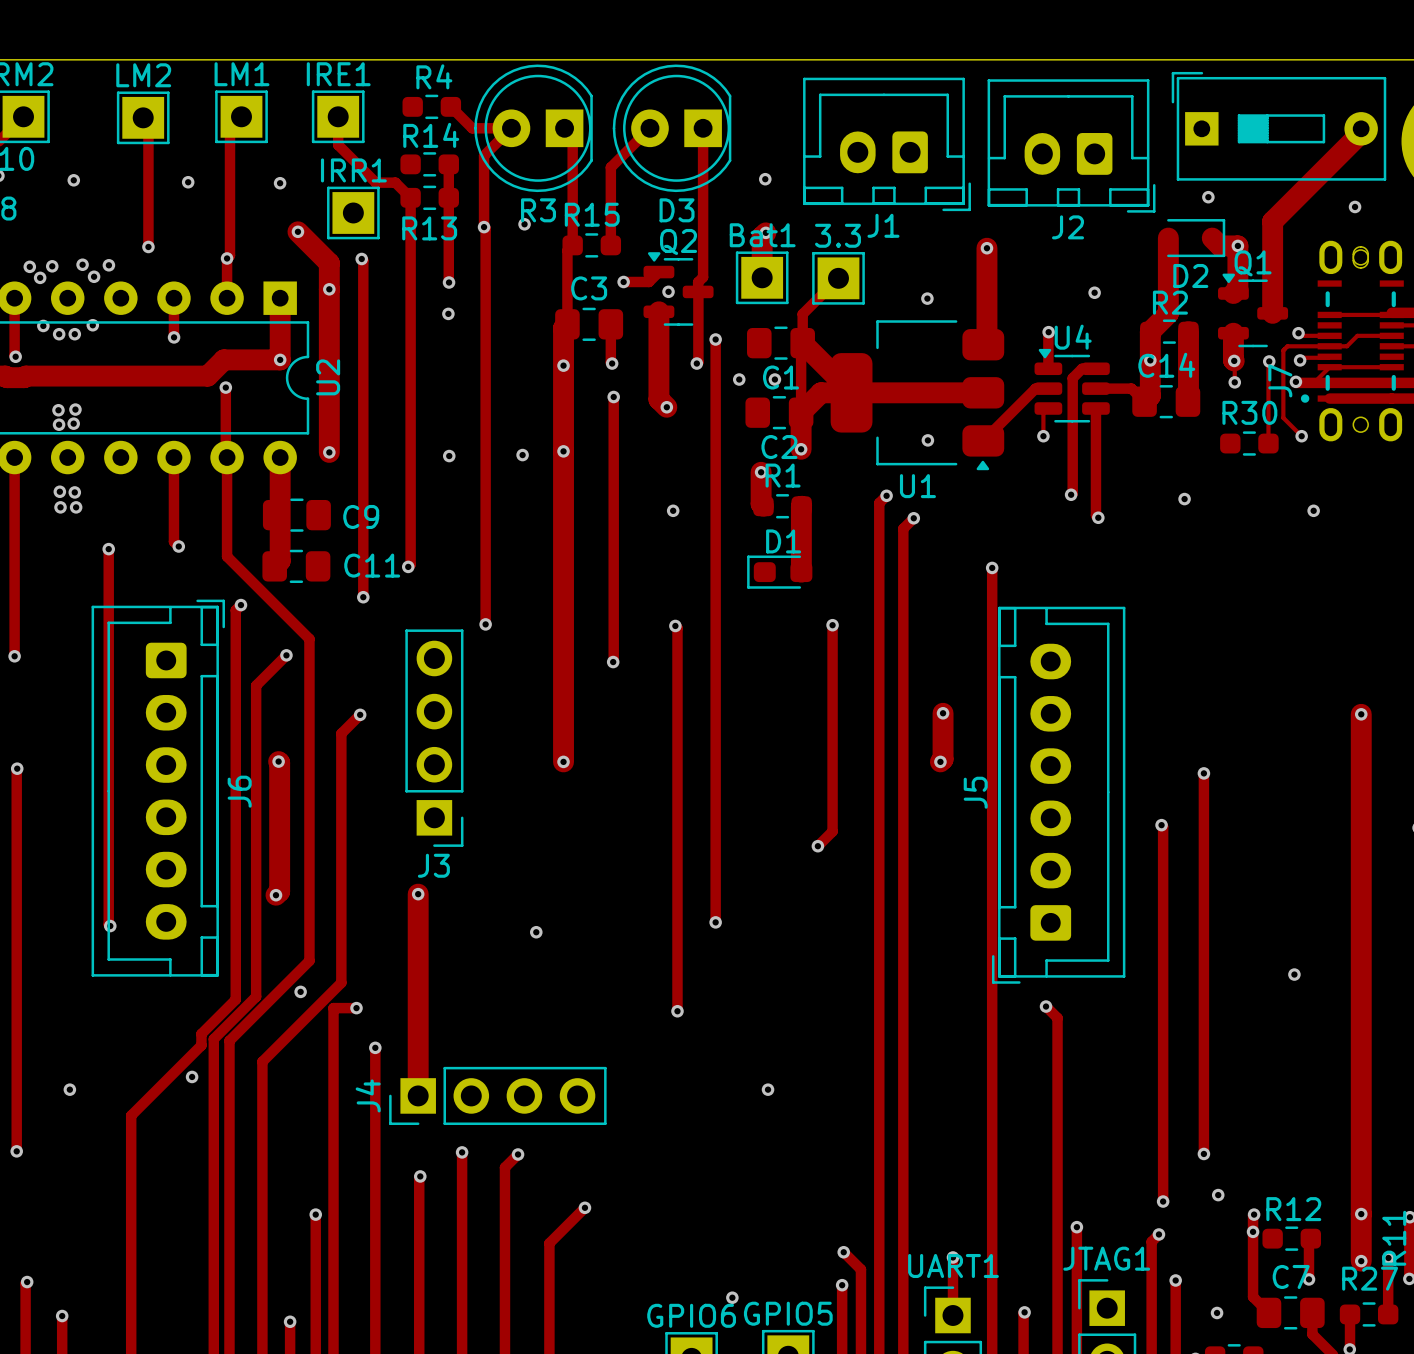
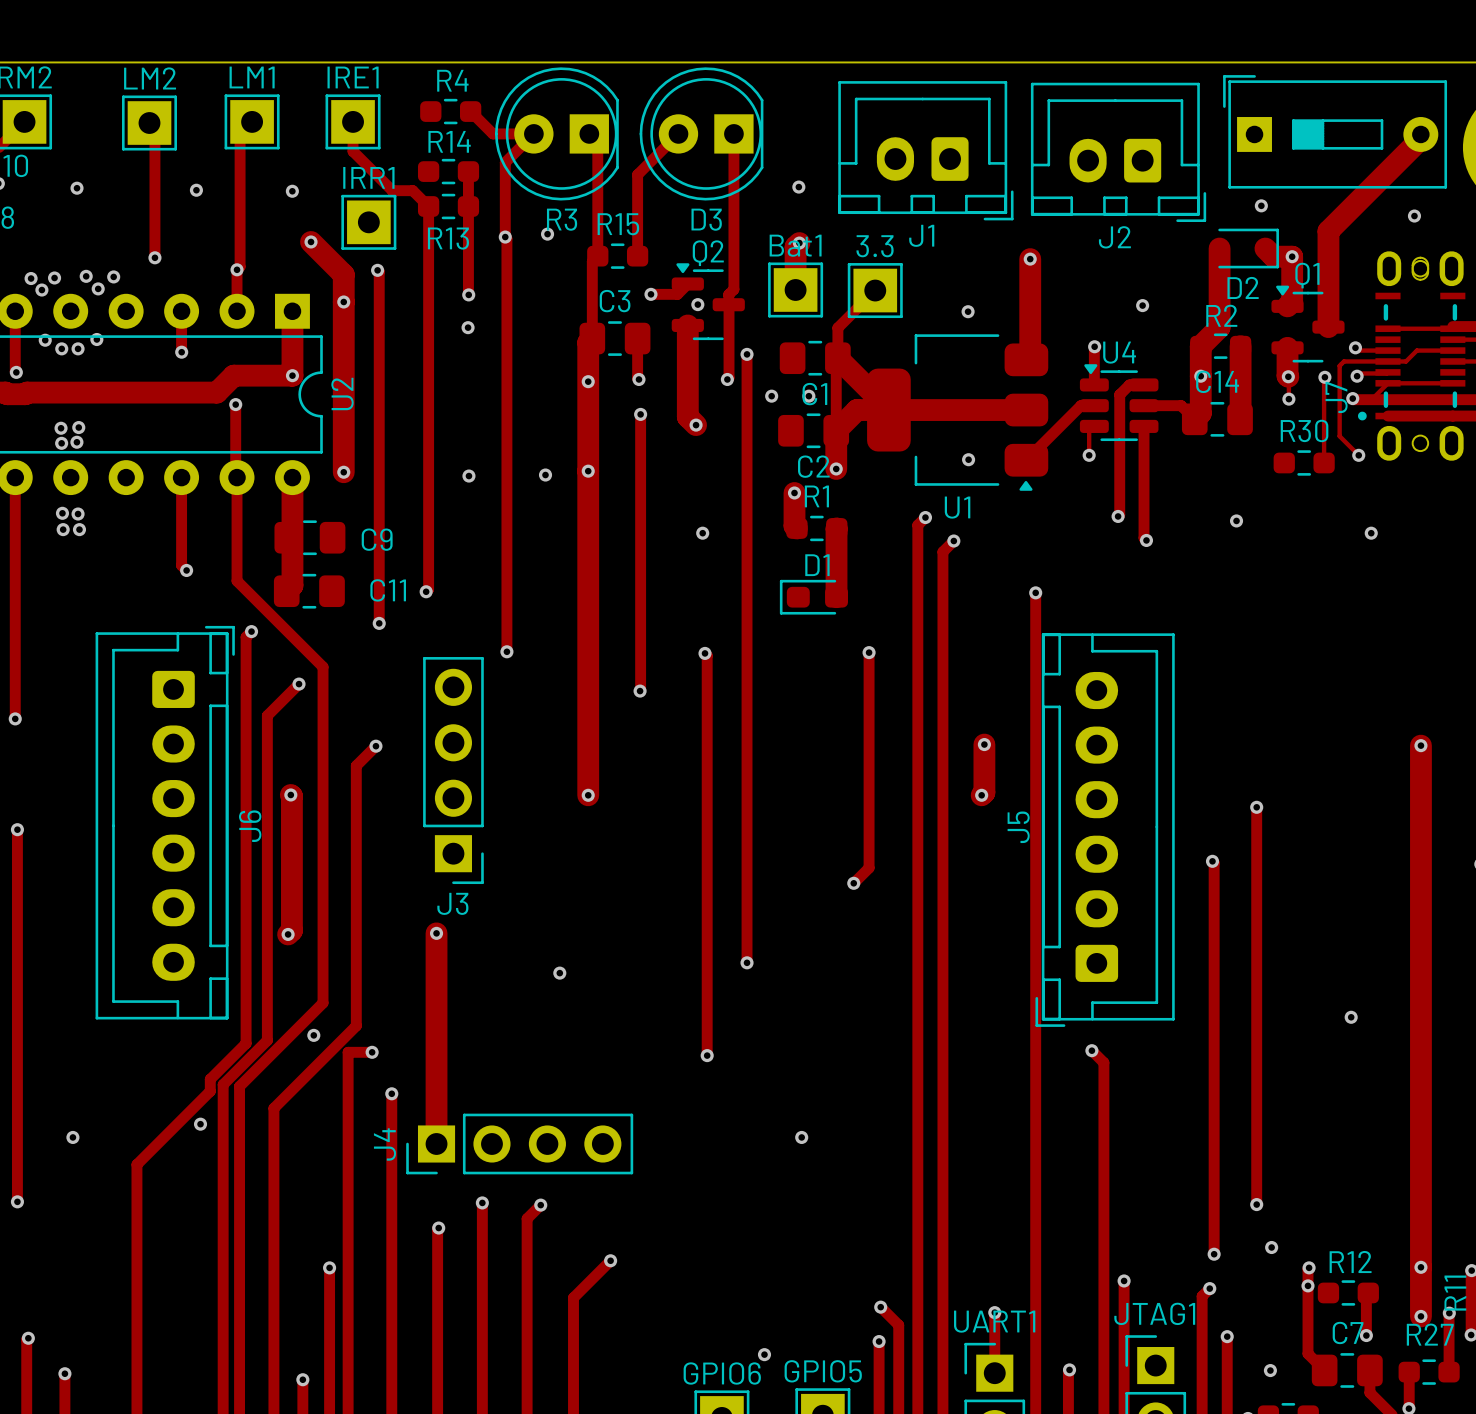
track: (108, 549) (108, 924) (110, 926) -> none
via: (108, 549) -> none
track: none -> (15, 685) (15, 718)
via position: (14, 656) -> (15, 718)
track: (17, 768) (16, 794) -> none
via: (17, 768) -> none
via: none -> (17, 829)
via: (110, 926) -> none

